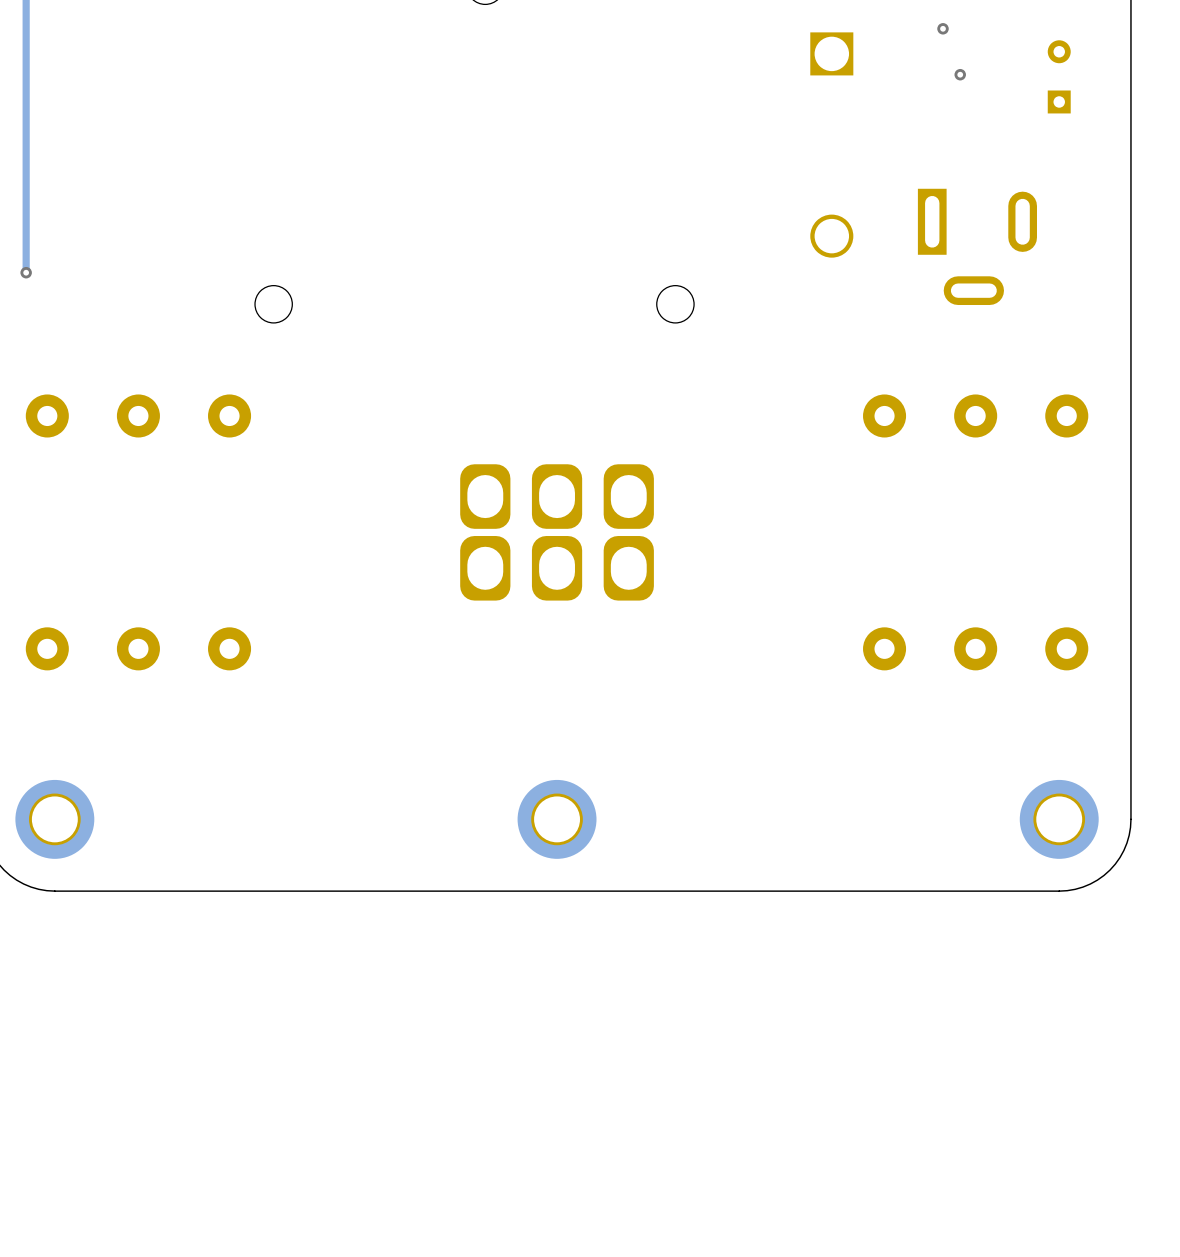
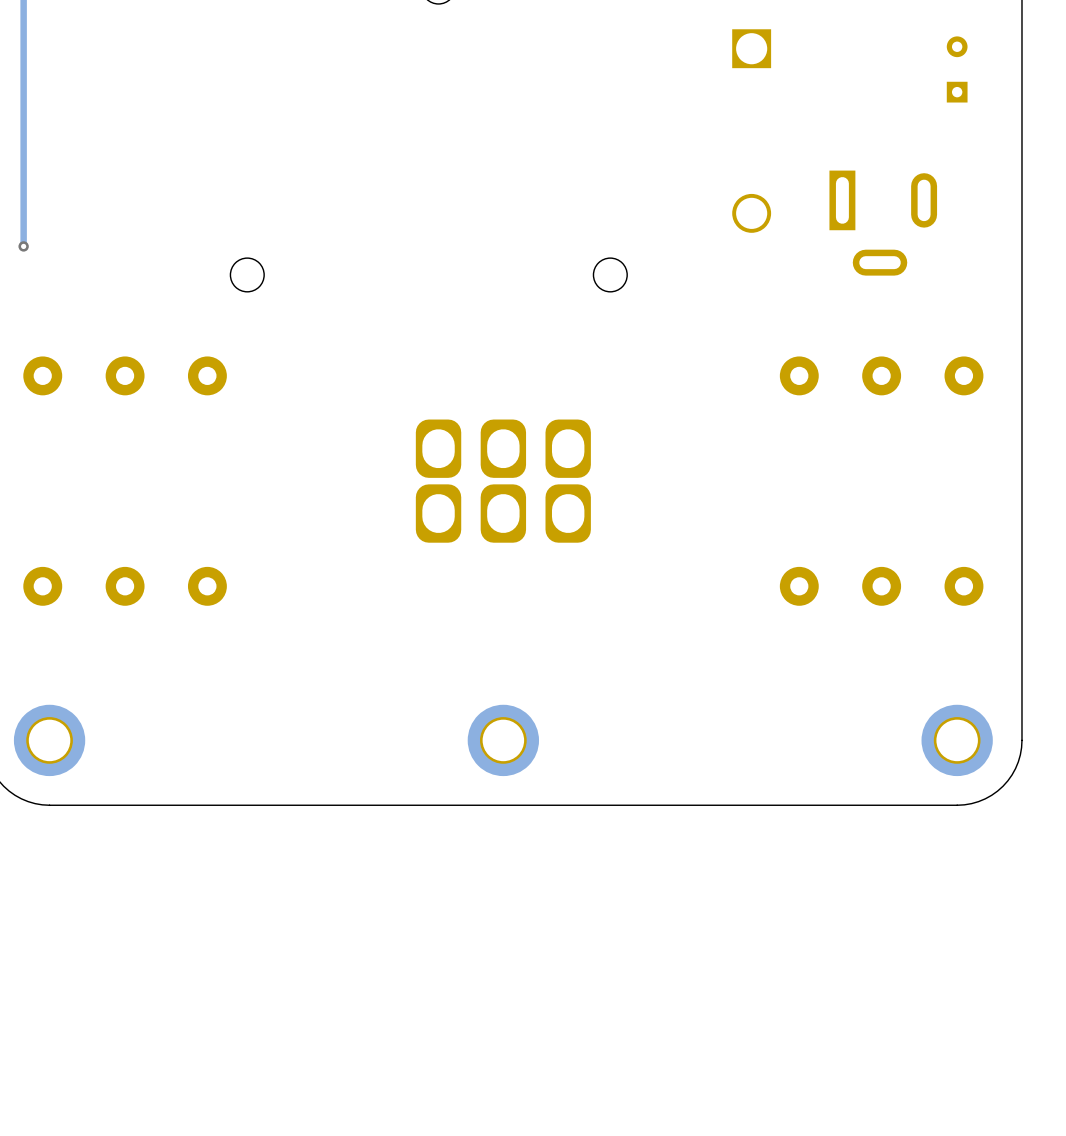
via: (943, 28) -> none
via: (960, 74) -> none

